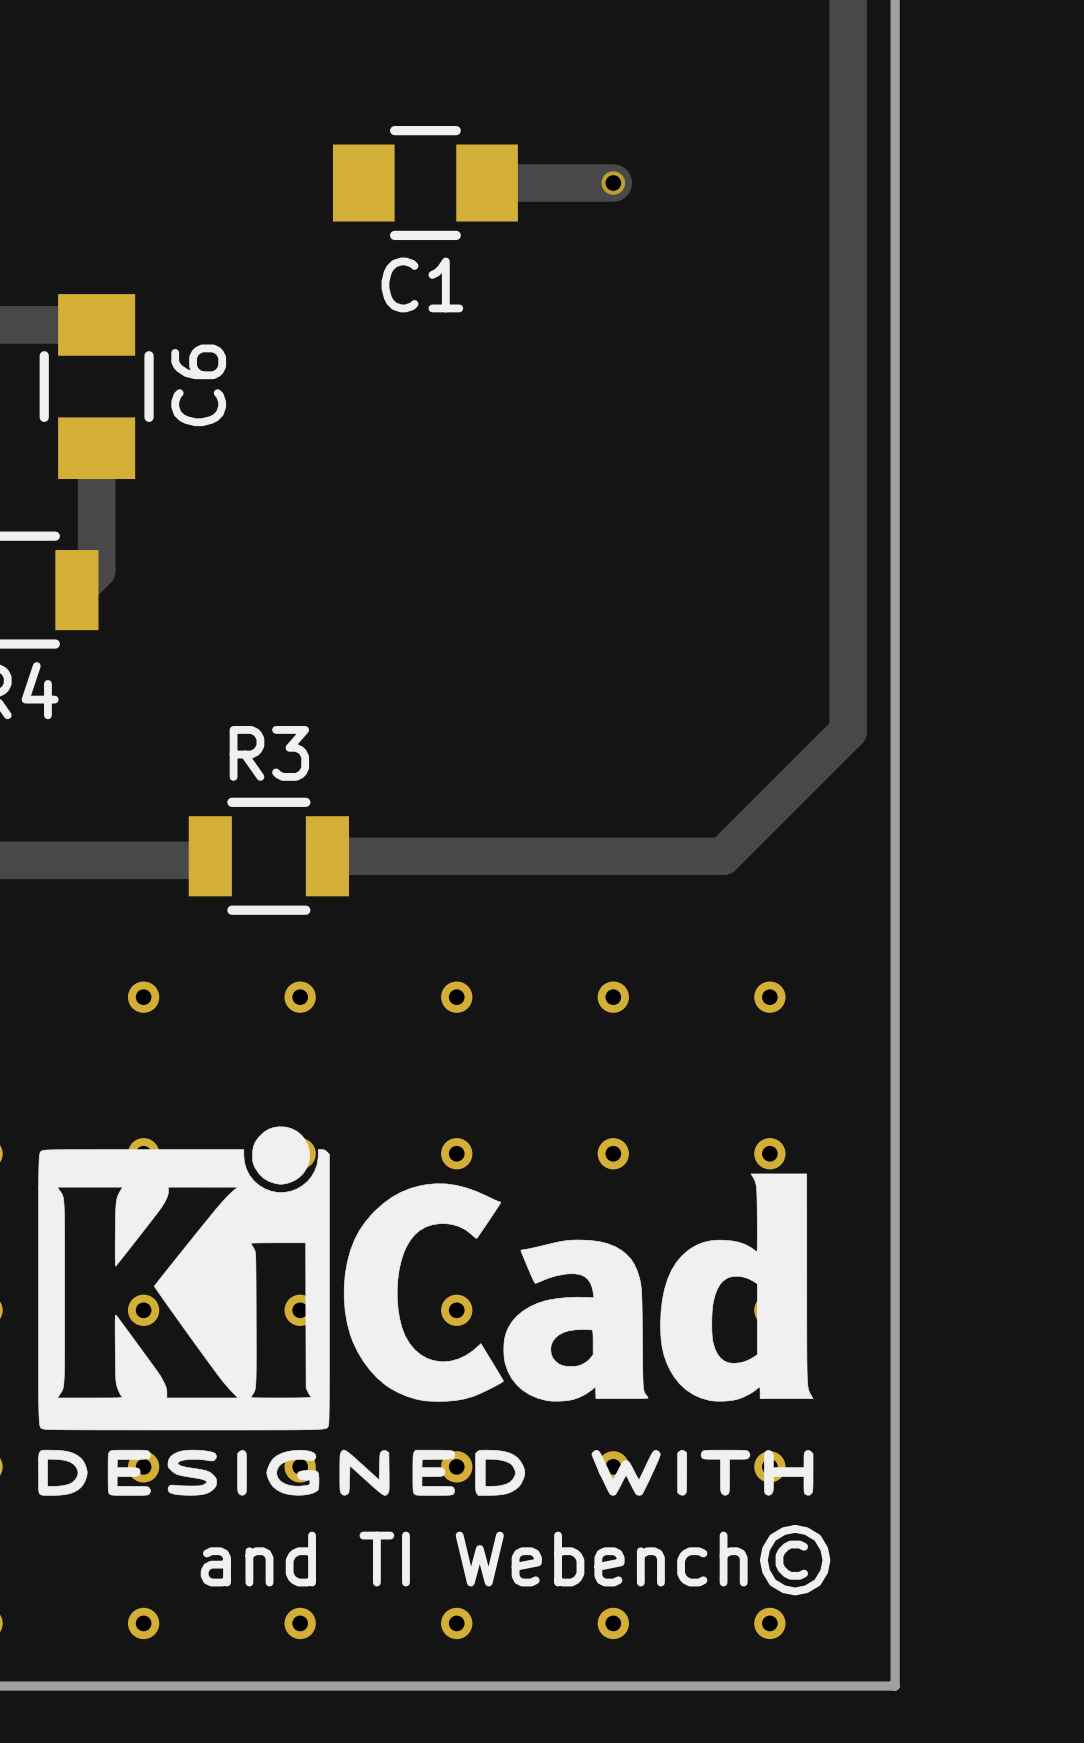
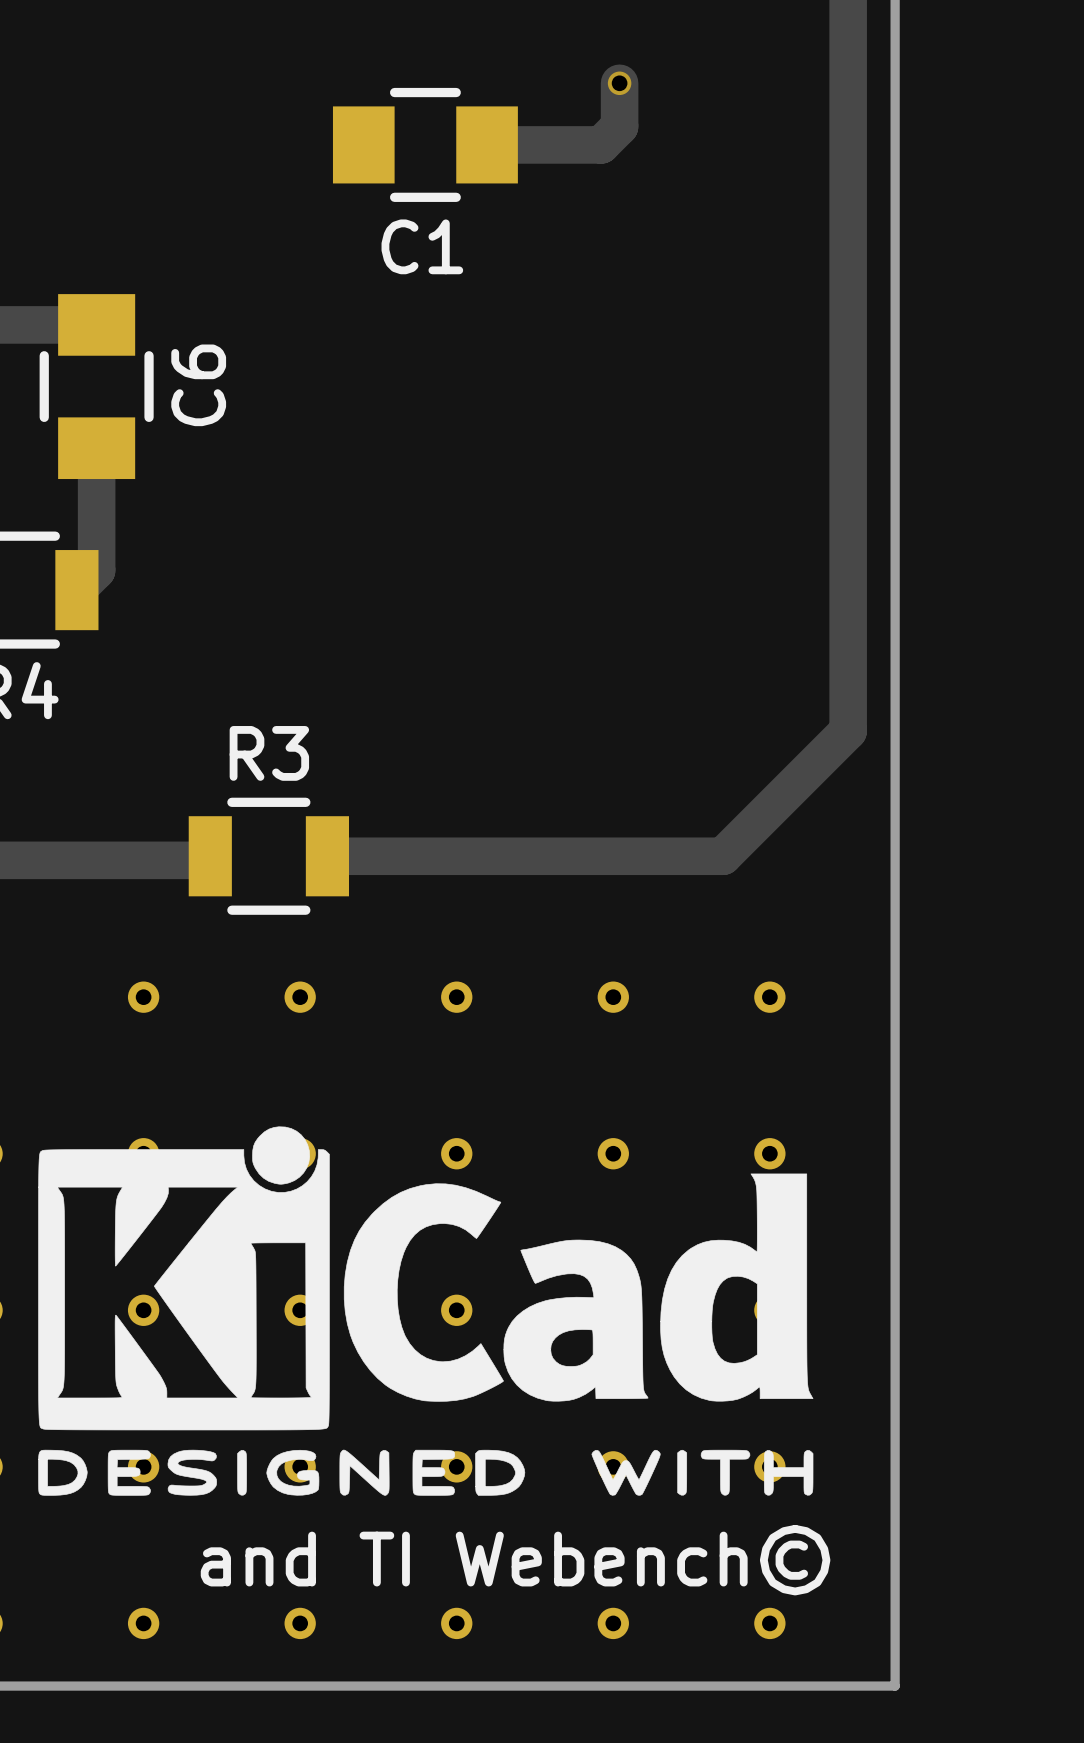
track: none -> (619, 83) (619, 126) (601, 144) (487, 144)
C1 position: (425, 183) -> (425, 144)
track: (487, 183) (613, 183) -> none
via position: (613, 183) -> (619, 83)

